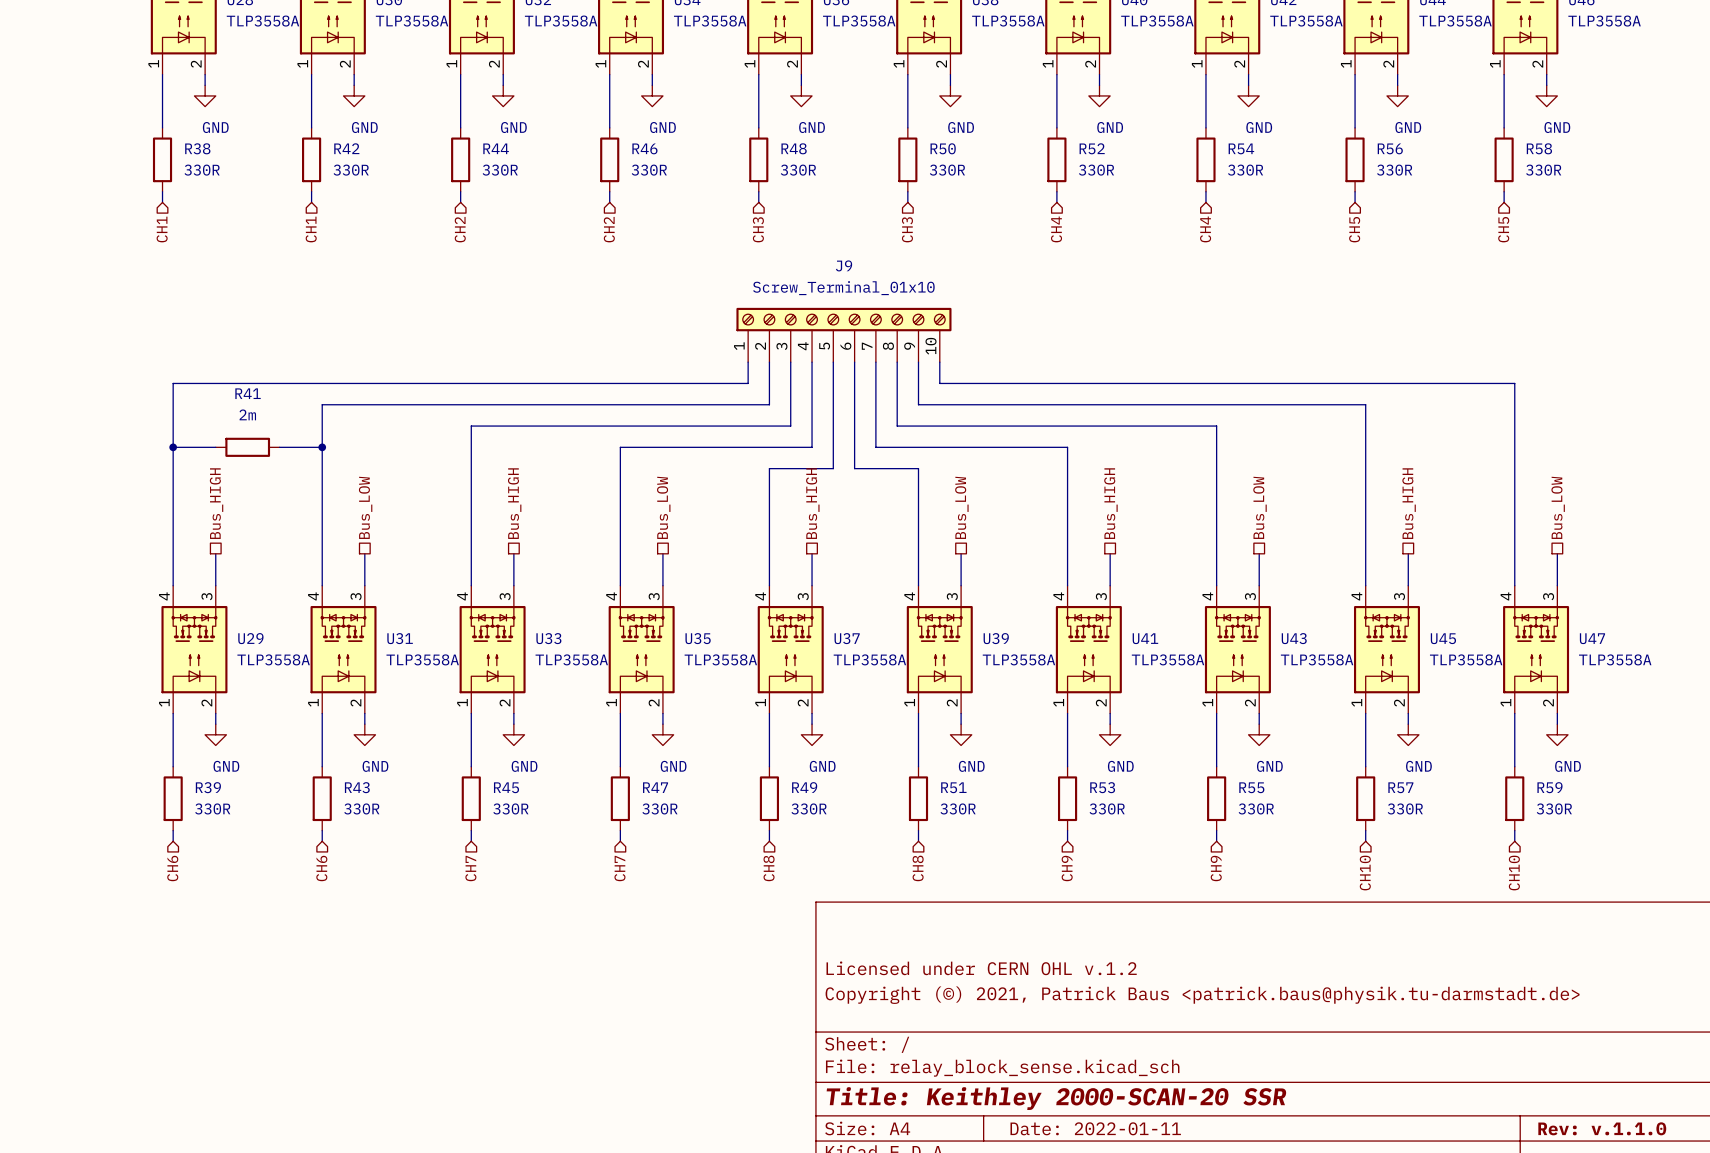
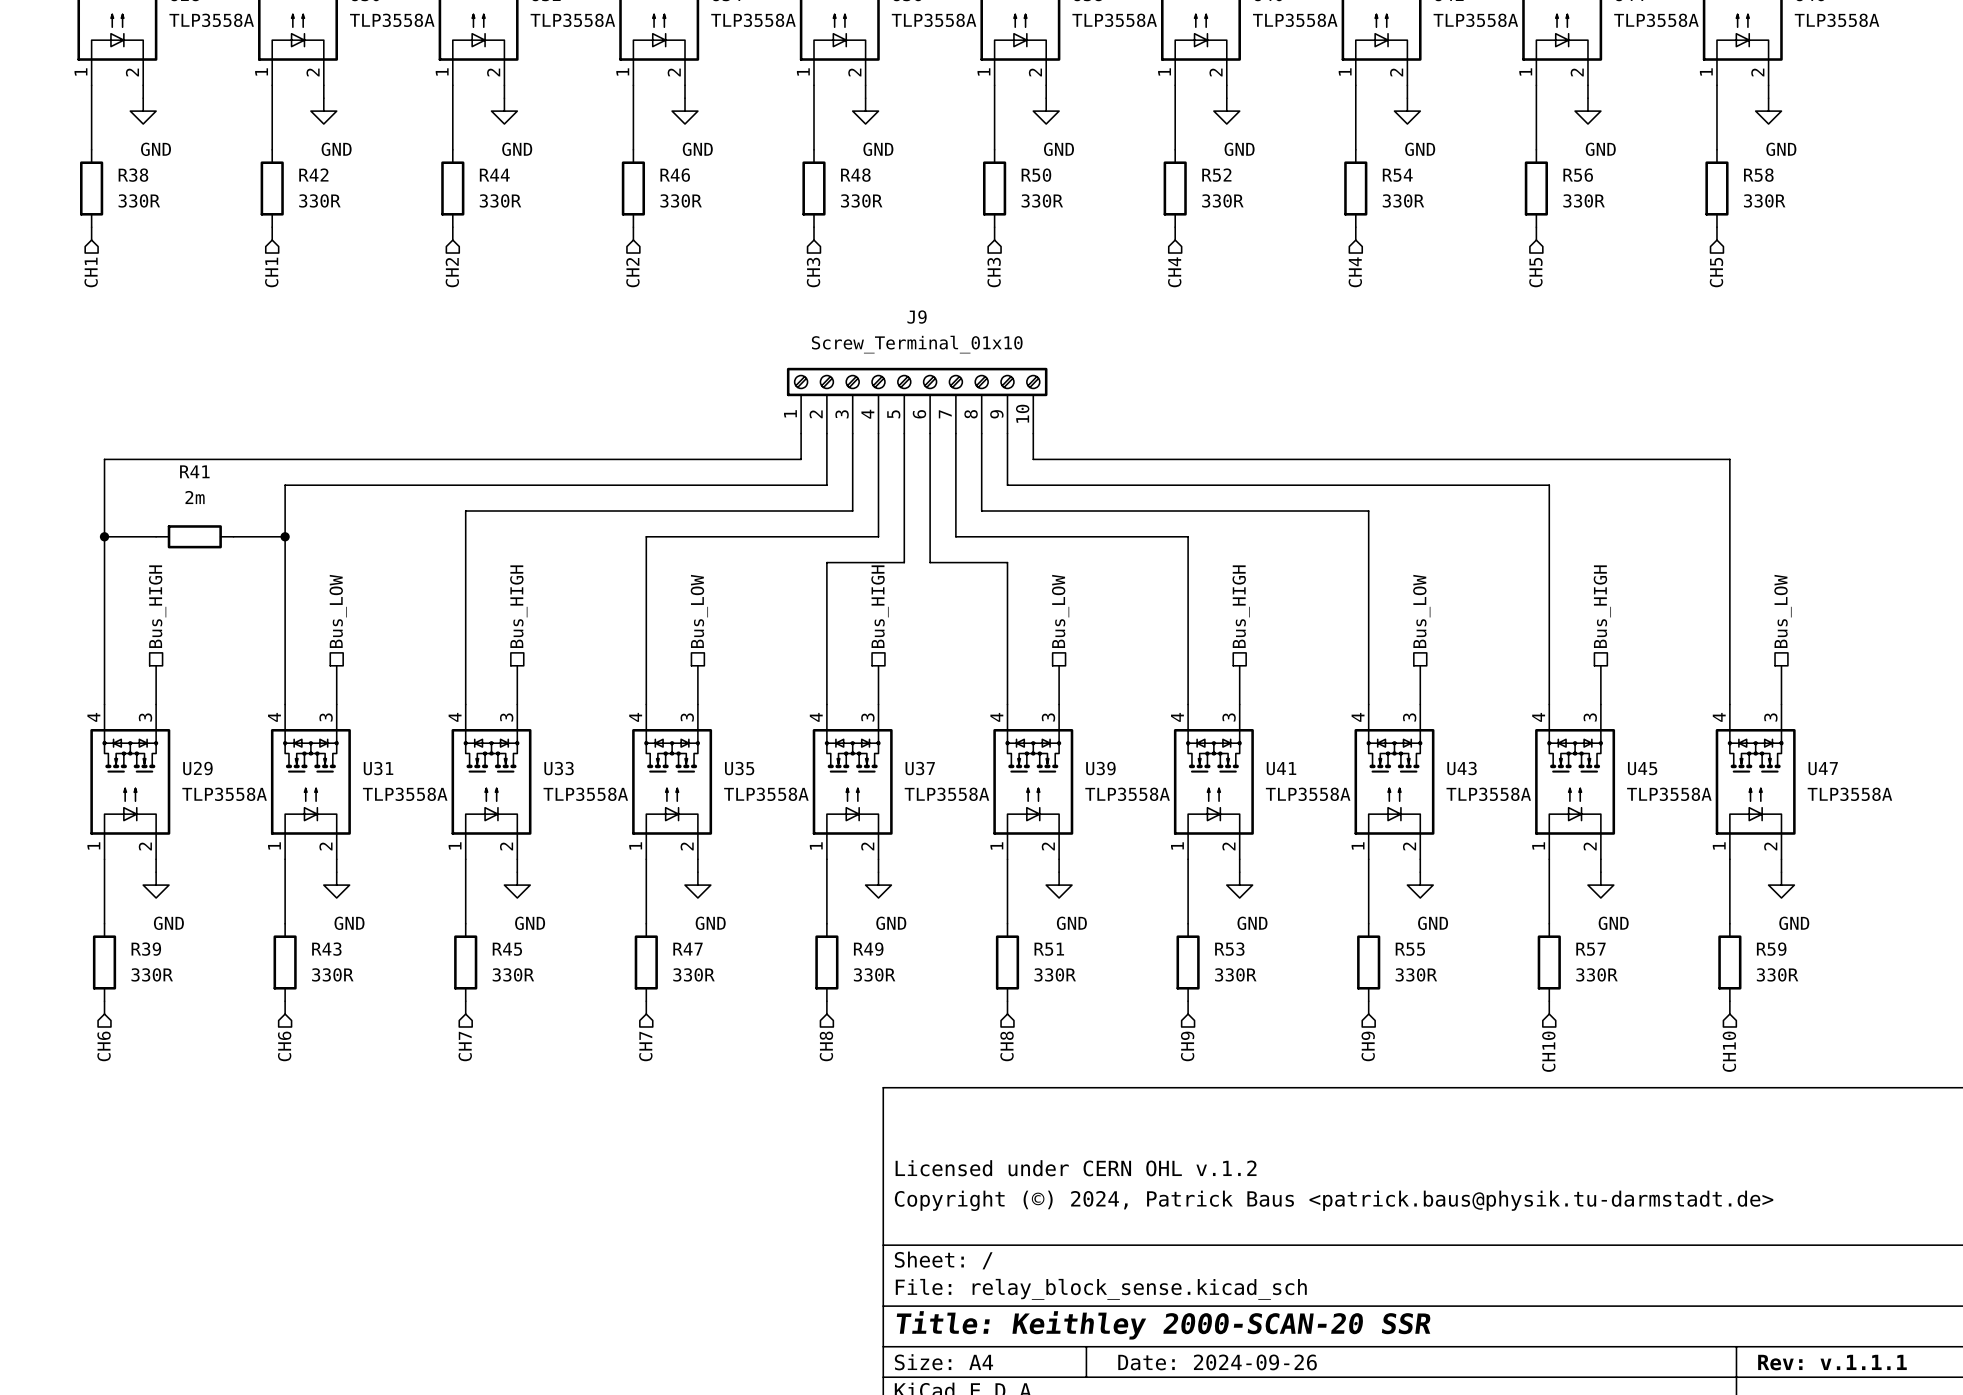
title block: Copyright (©) 2021, Patrick Baus <patrick.baus@physik.tu-darmstadt.de> (1202, 995) -> Copyright (©) 2024, Patrick Baus <patrick.baus@physik.tu-darmstadt.de> (1334, 1200)
title block: Date: 2022-01-11 (1095, 1128) -> Date: 2024-09-26 (1217, 1362)
title block: Rev: v.1.1.0 (1602, 1128) -> Rev: v.1.1.1 (1832, 1362)

